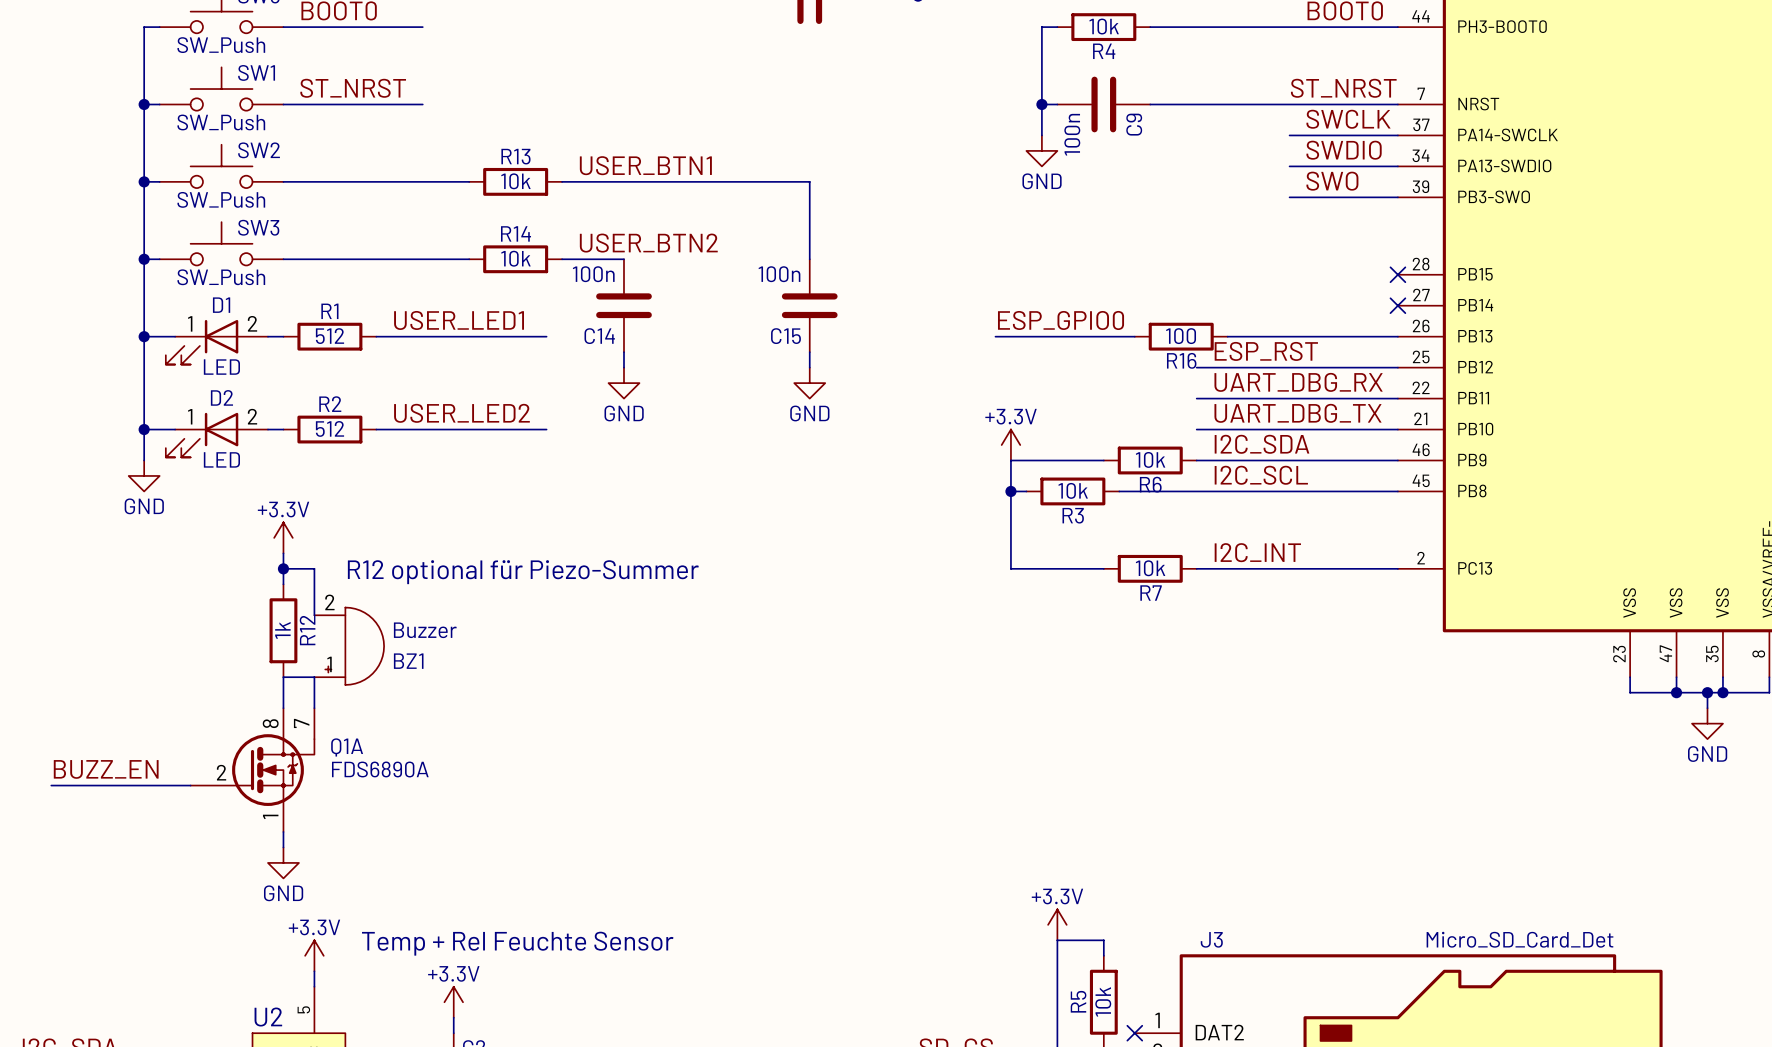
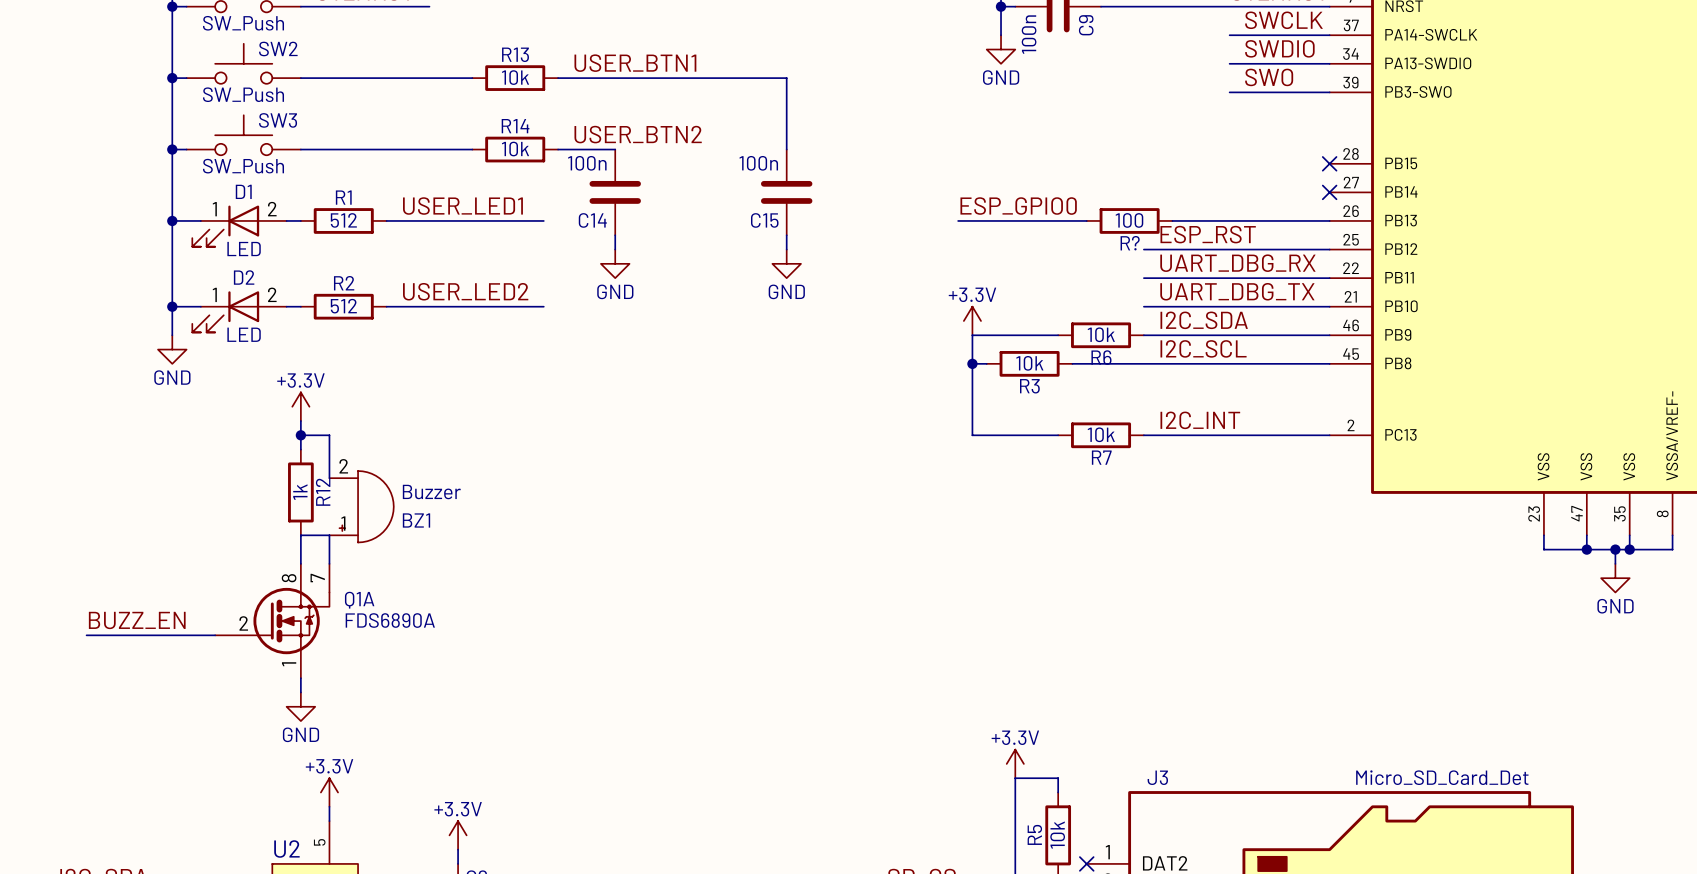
R16 name: R16 (1181, 360) -> R? (1130, 243)
text: R12 optional für Piezo-Summer (523, 572) -> none
text: Temp + Rel Feuchte Sensor (517, 943) -> none

